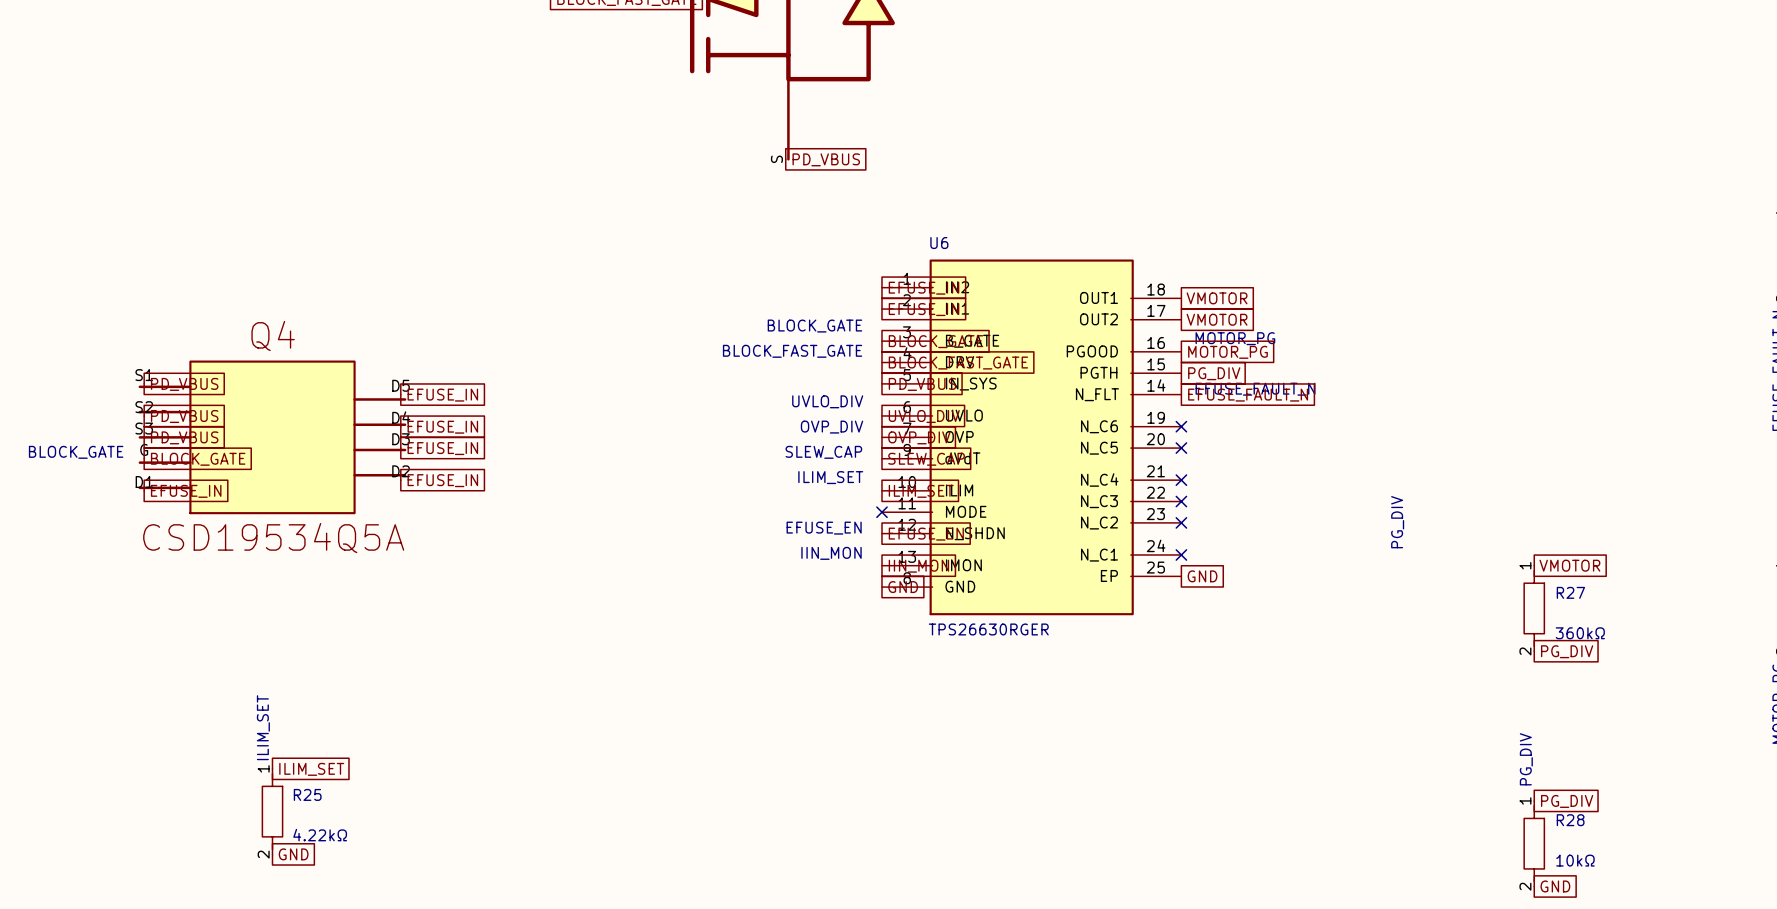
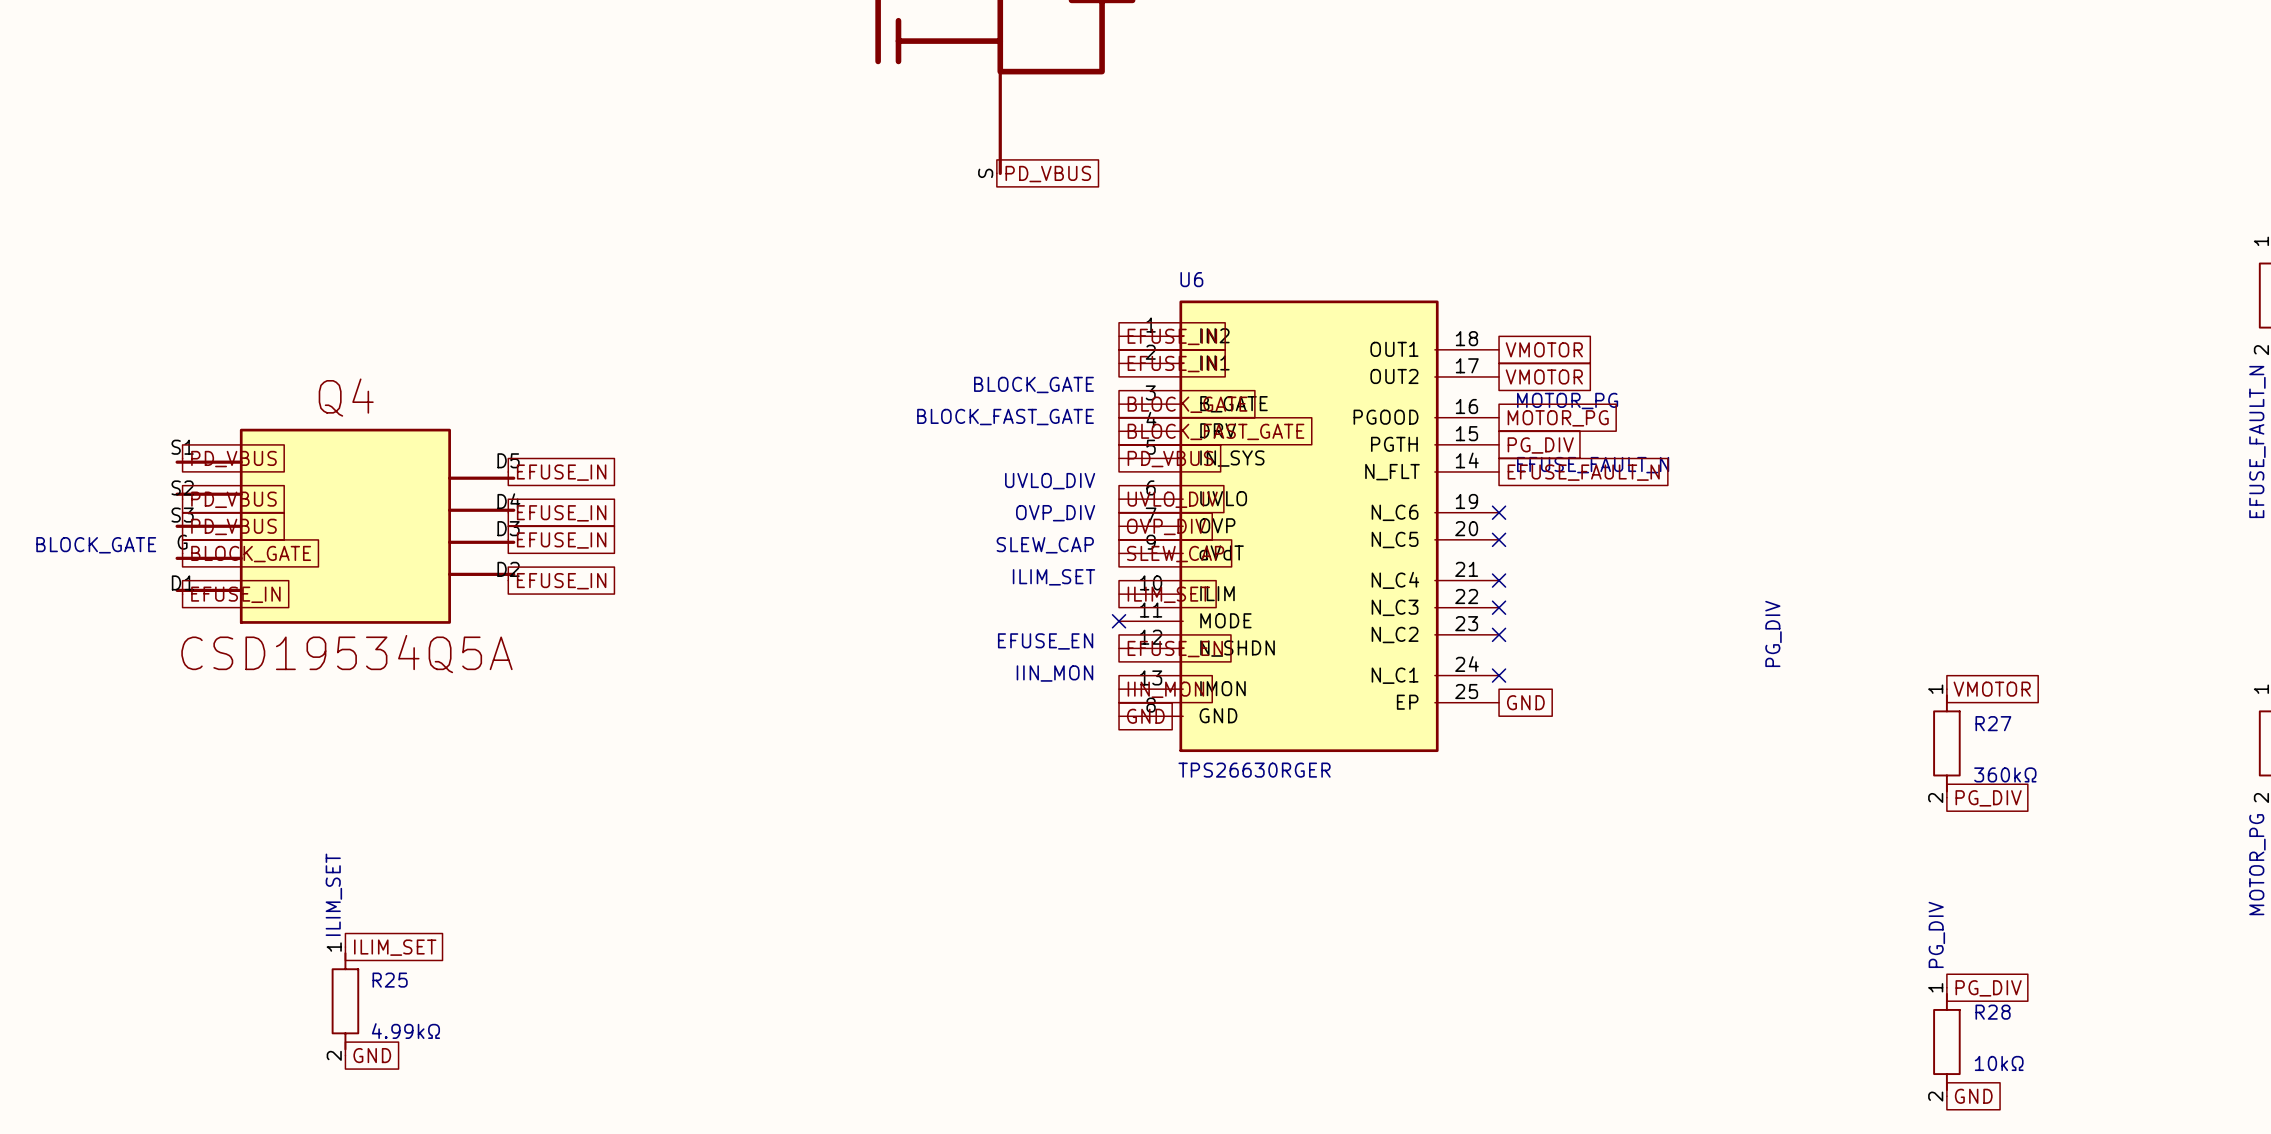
R25 value: 4.22kΩ (320, 835) -> 4.99kΩ (405, 1031)

